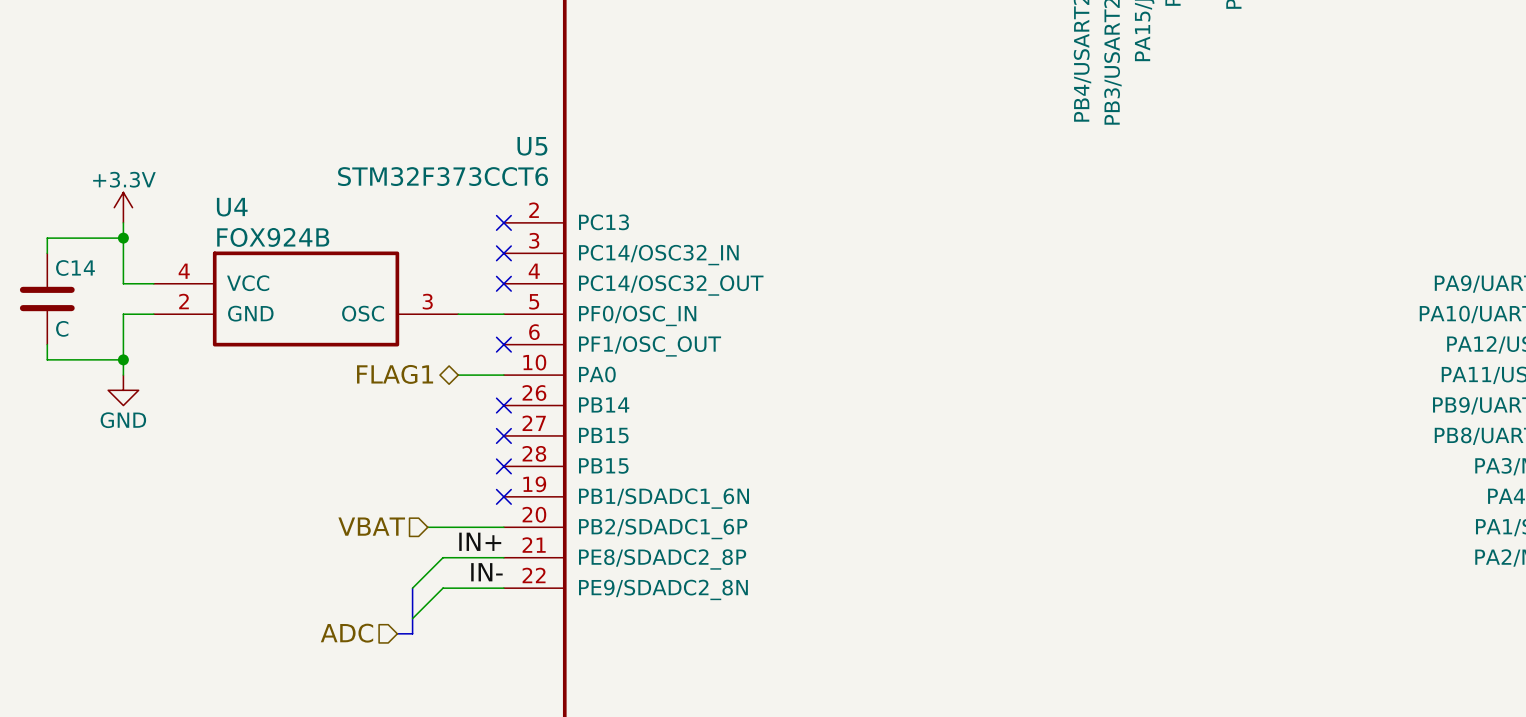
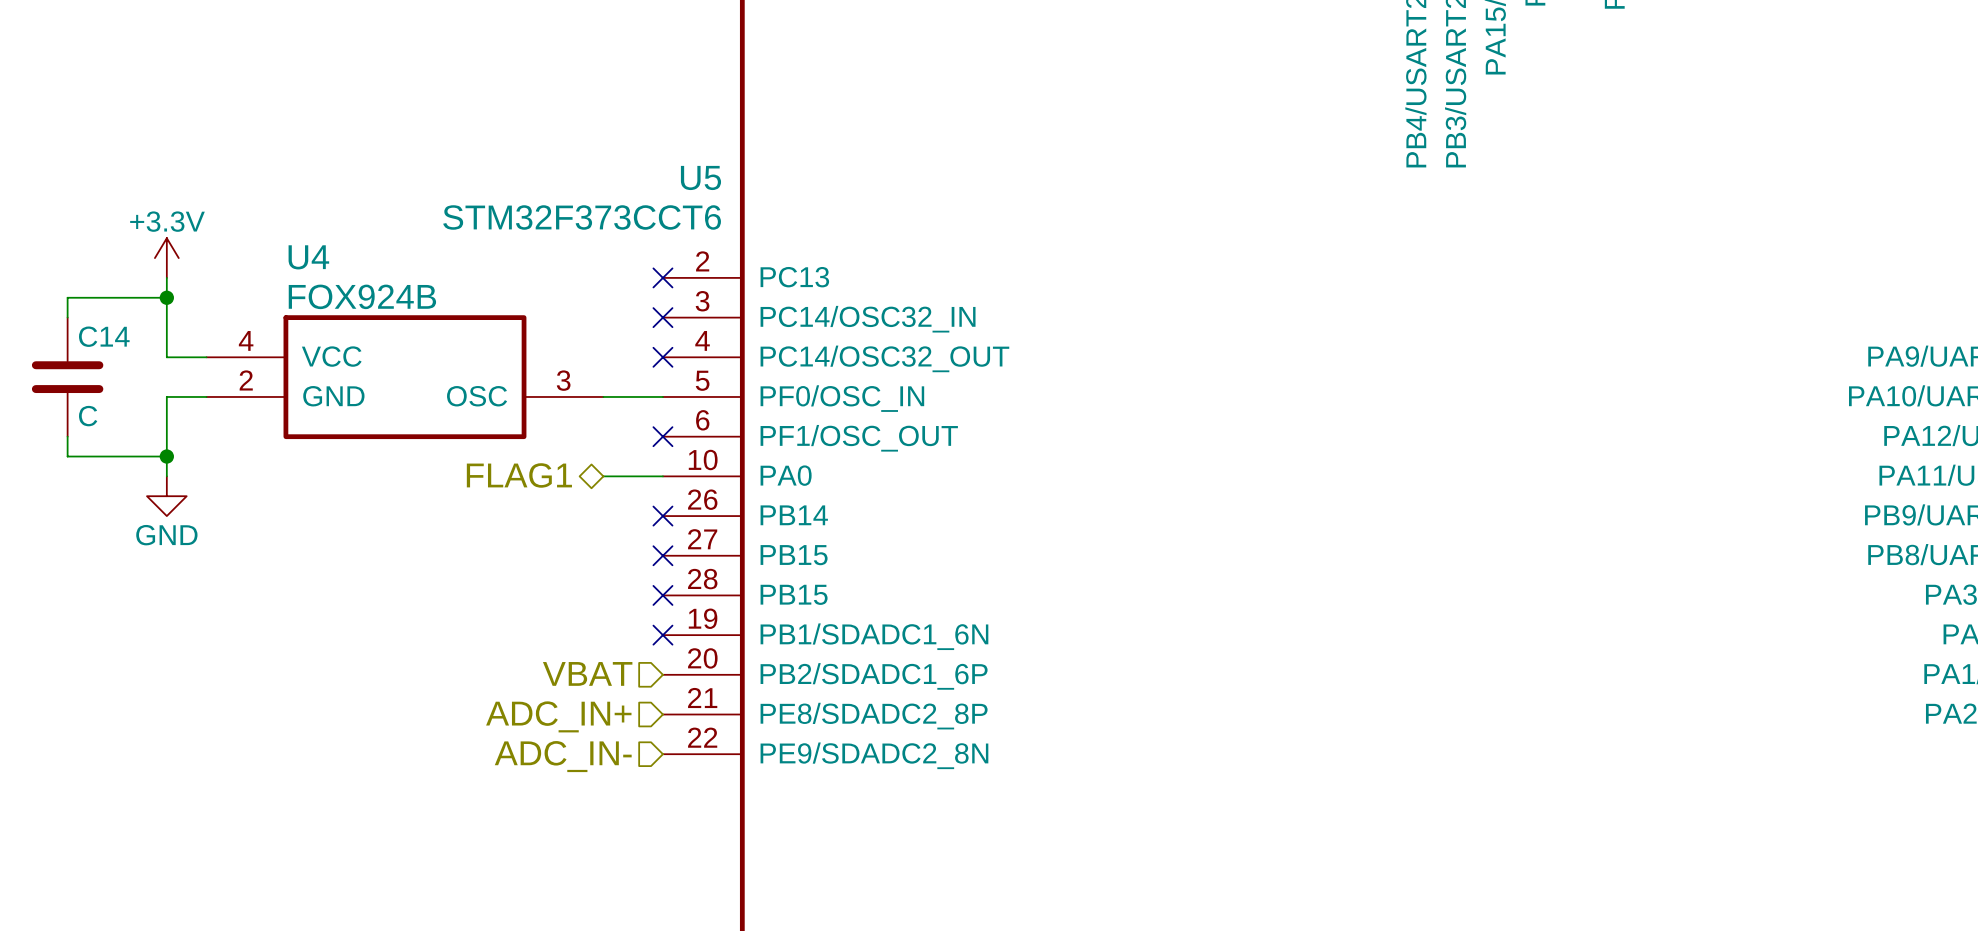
hierarchical label position: VBAT (371, 526) -> VBAT (587, 673)
wire: (427, 527) (503, 527) -> none
label: IN+ (480, 541) -> none
wire: (503, 557) (443, 557) (412, 588) -> none
hierarchical label: none -> ADC_IN+ (558, 716)
label: IN- (486, 572) -> none
bus: (412, 588) (412, 633) (397, 633) -> none
wire: (503, 588) (443, 588) (412, 618) -> none
hierarchical label: none -> ADC_IN- (563, 756)
hierarchical label: ADC (346, 633) -> none

